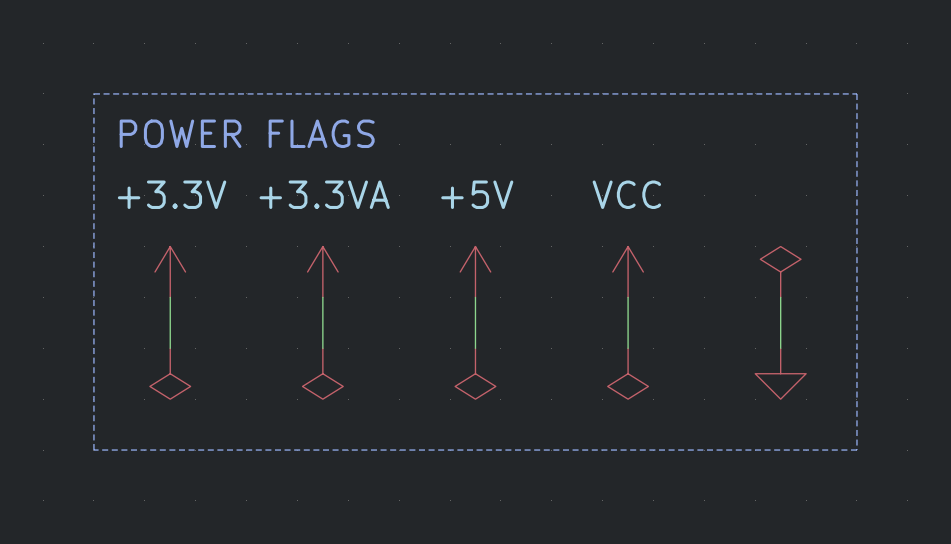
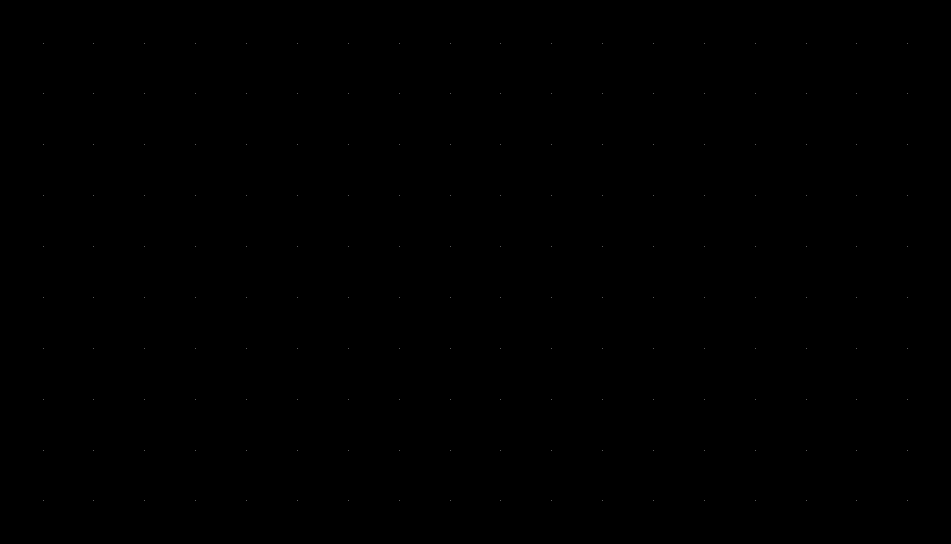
line: (93, 93) (856, 93) (856, 450) (93, 450) (93, 93) -> none
text: POWER FLAGS (247, 133) -> none
power symbol: +3.3V (170, 271) -> none
power symbol: +3.3VA (322, 271) -> none
power symbol: +5V (475, 271) -> none
power symbol: VCC (628, 271) -> none
power symbol: (780, 271) -> none
wire: (170, 297) (170, 348) -> none
wire: (322, 297) (322, 348) -> none
wire: (475, 297) (475, 348) -> none
wire: (628, 297) (628, 348) -> none
wire: (780, 297) (780, 348) -> none
power symbol: (170, 373) -> none
power symbol: (322, 373) -> none
power symbol: (475, 373) -> none
power symbol: (628, 373) -> none
power symbol: (780, 373) -> none

